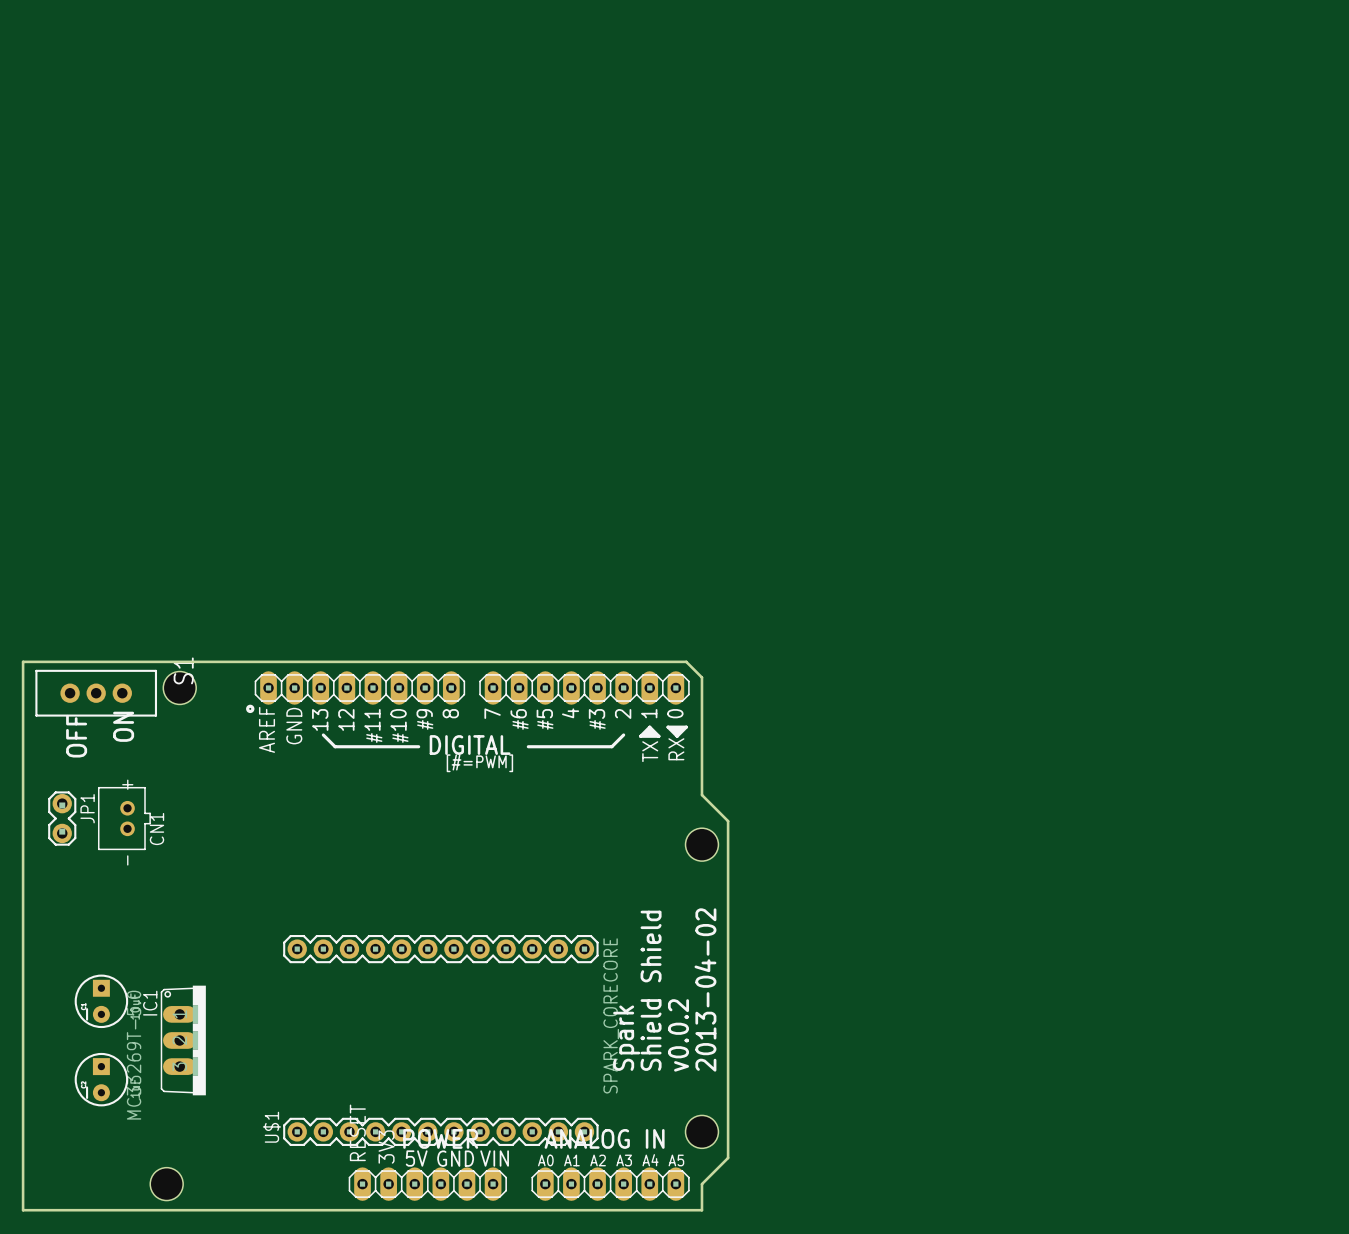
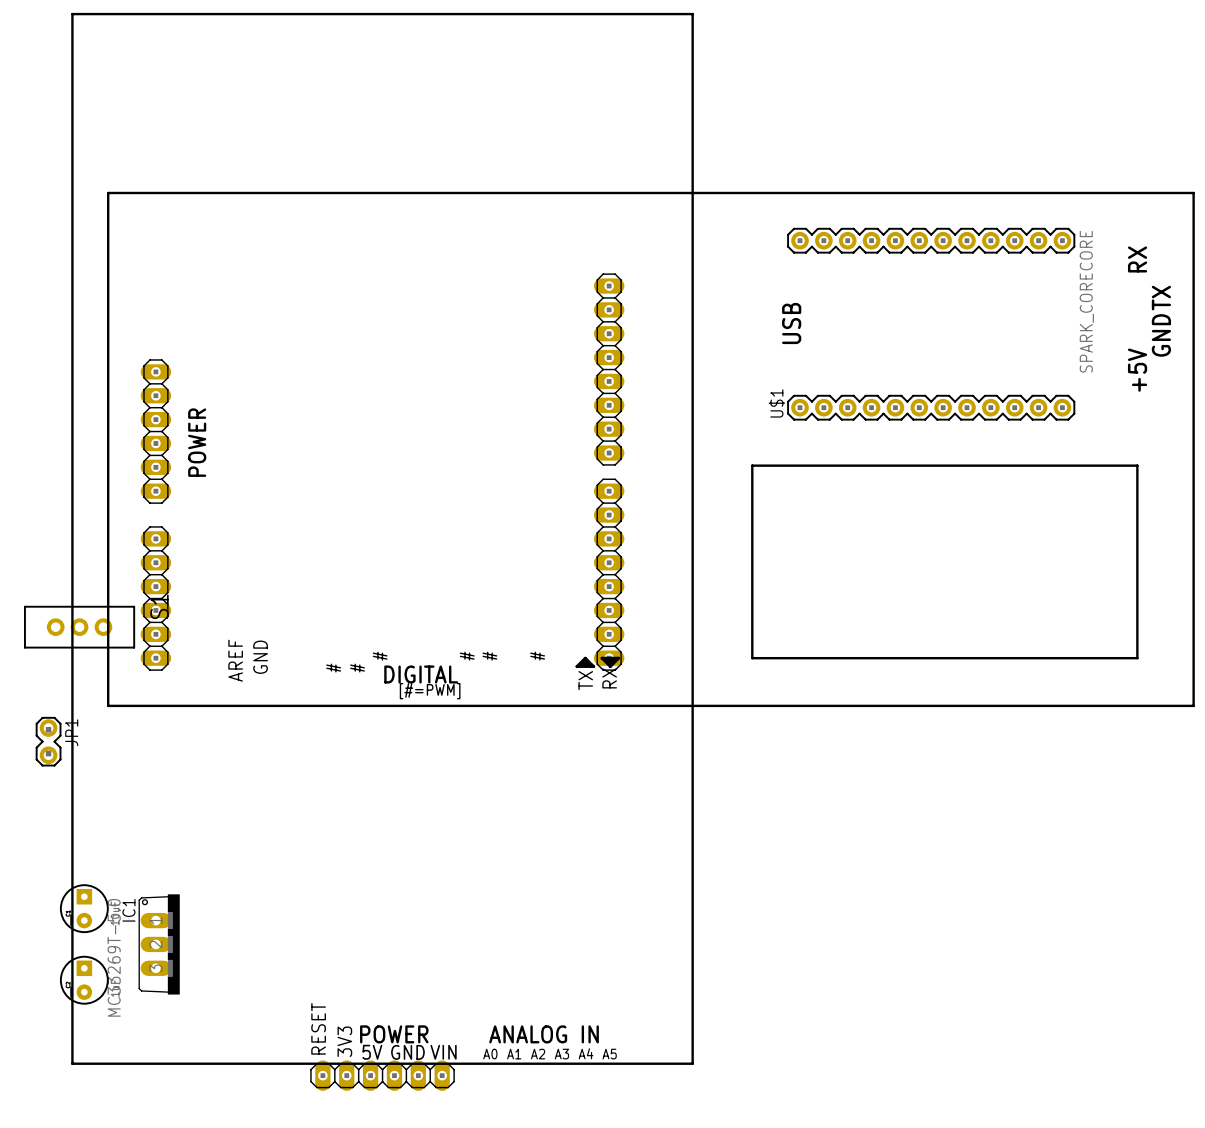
line: none -> (72, 14) (72, 1063) (692, 1063) (692, 14) (72, 14)
board edge: none -> (108, 193) (108, 705) (1193, 705) (1193, 193) (108, 193)
text: none -> RX (1137, 259)
text: none -> TX (1161, 298)
text: none -> USB (791, 323)
text: none -> GND (1161, 335)
part: none -> (609, 369)
text: none -> +5V (1137, 370)
POWER: none -> (155, 431)
line: none -> (752, 465) (752, 658) (1137, 658) (1137, 465) (752, 465)
board edge: (23, 661) (686, 661) (701, 677) (701, 795) (728, 821) (728, 1157) (701, 1184) (701, 1210) (23, 1210) (23, 661) -> none
part: none -> (155, 598)
hole: (179, 687) -> none
part: (359, 687) -> none
part rotation: 0° (584, 687) -> 90° clockwise (609, 574)
drawing: [246, 704, 255, 714] -> none
text: 9 (424, 713) -> none
text: 8 (450, 713) -> none
text: 7 (492, 713) -> none
text: 6 (518, 713) -> none
text: 5 (544, 713) -> none
text: 4 (570, 713) -> none
text: 3 (597, 713) -> none
text: 2 (623, 713) -> none
text: 1 (649, 713) -> none
text: 0 (675, 713) -> none
text: 13 (320, 719) -> none
text: 12 (346, 719) -> none
text: 11 (372, 719) -> none
text: 10 (398, 719) -> none
text: ON (123, 726) -> none
line: (323, 734) (335, 746) (418, 746) -> none
line: (623, 734) (611, 746) (528, 746) -> none
text: OFF (76, 736) -> none
CN1: (124, 818) -> none
hole: (701, 844) -> none
text: 2013-04-02 (705, 989) -> none
text: Shield Shield (651, 990) -> none
text: v0.0.2 (678, 1035) -> none
text: Spark (626, 1038) -> none
U$1 position: (440, 1040) -> (931, 324)
hole: (701, 1131) -> none
hole: (166, 1184) -> none
part: (610, 1184) -> none

